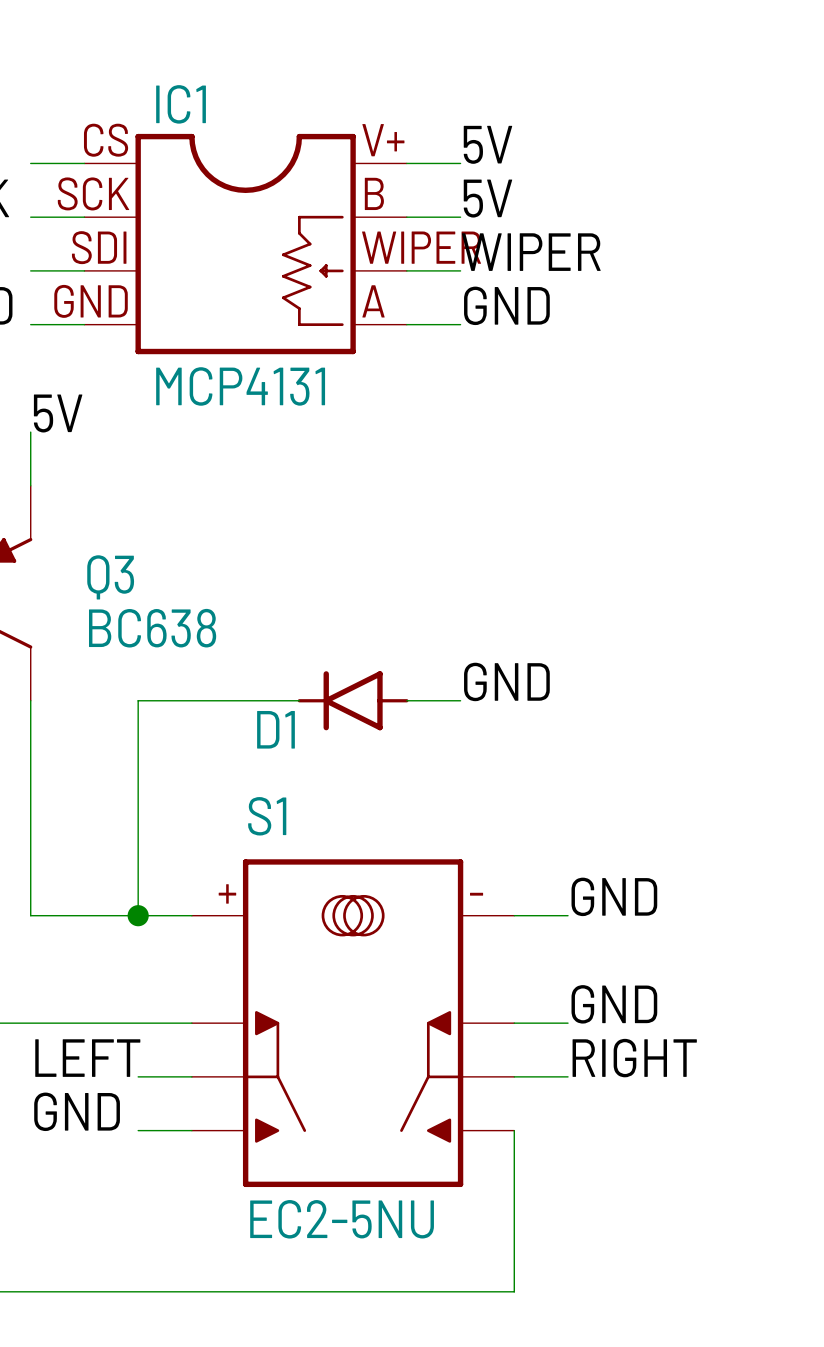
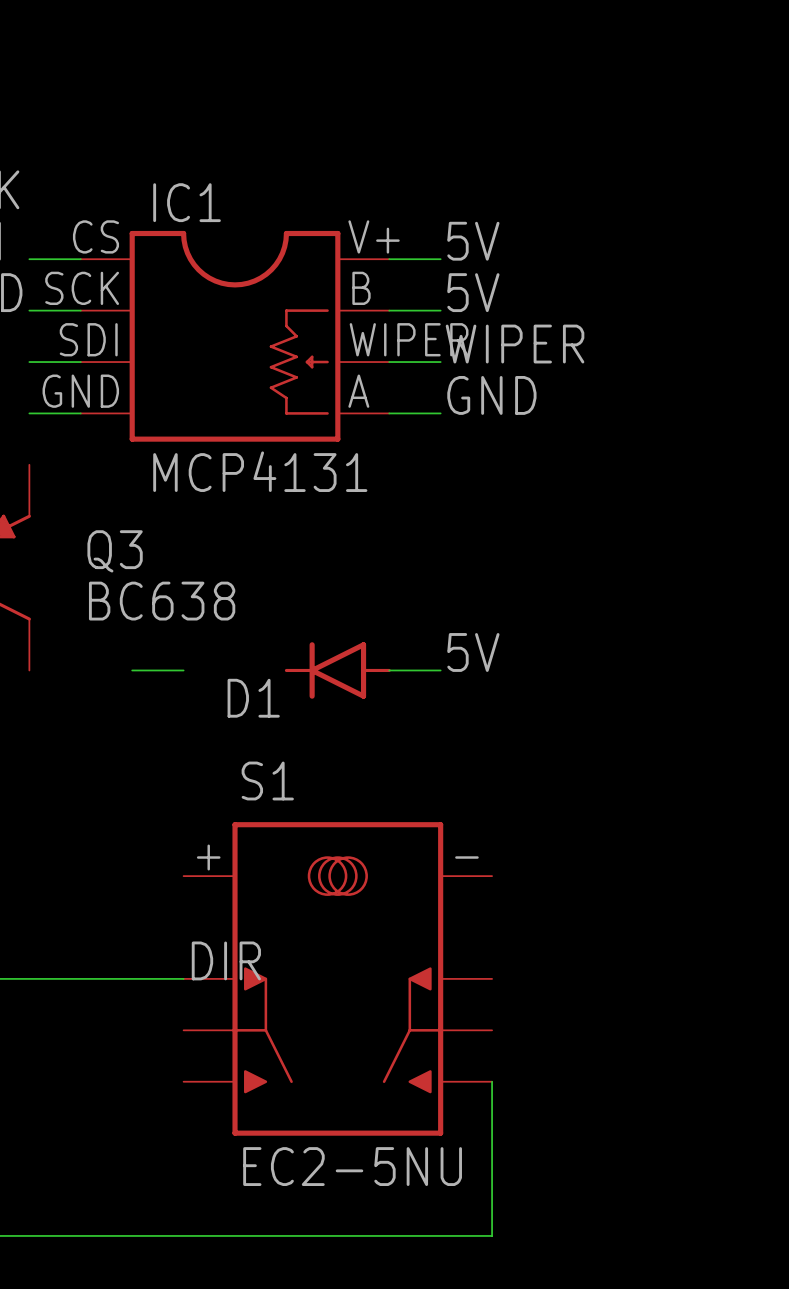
label: 5V (488, 144) -> none
wire: (30, 163) (84, 163) -> (29, 362) (80, 362)
wire: (406, 163) (460, 163) -> (389, 362) (440, 362)
label: 5V (488, 198) -> none
wire: (30, 217) (84, 217) -> none
wire: (406, 217) (460, 217) -> (389, 413) (440, 413)
IC1 position: (245, 244) -> (235, 336)
label: WIPER (531, 252) -> 5V (473, 241)
label: GND (506, 305) -> 5V (473, 292)
label: none -> WIPER (515, 344)
label: 5V (58, 413) -> none
label: none -> GND (491, 395)
wire: (30, 432) (30, 485) -> (29, 413) (80, 413)
label: GND (506, 681) -> 5V (473, 652)
wire: (30, 700) (30, 915) (191, 915) -> none
wire: (138, 700) (138, 915) -> none
wire: (191, 700) (299, 700) -> none
label: GND (614, 896) -> none
junction: (138, 915) -> none
wire: (514, 915) (568, 915) -> none
label: none -> DIR (226, 960)
label: GND (614, 1004) -> none
wire: (514, 1023) (568, 1023) -> none
label: LEFT (87, 1058) -> none
label: RIGHT (634, 1058) -> none
wire: (138, 1076) (191, 1076) -> none
wire: (514, 1076) (568, 1076) -> none
label: GND (77, 1111) -> none
wire: (138, 1130) (191, 1130) -> none

